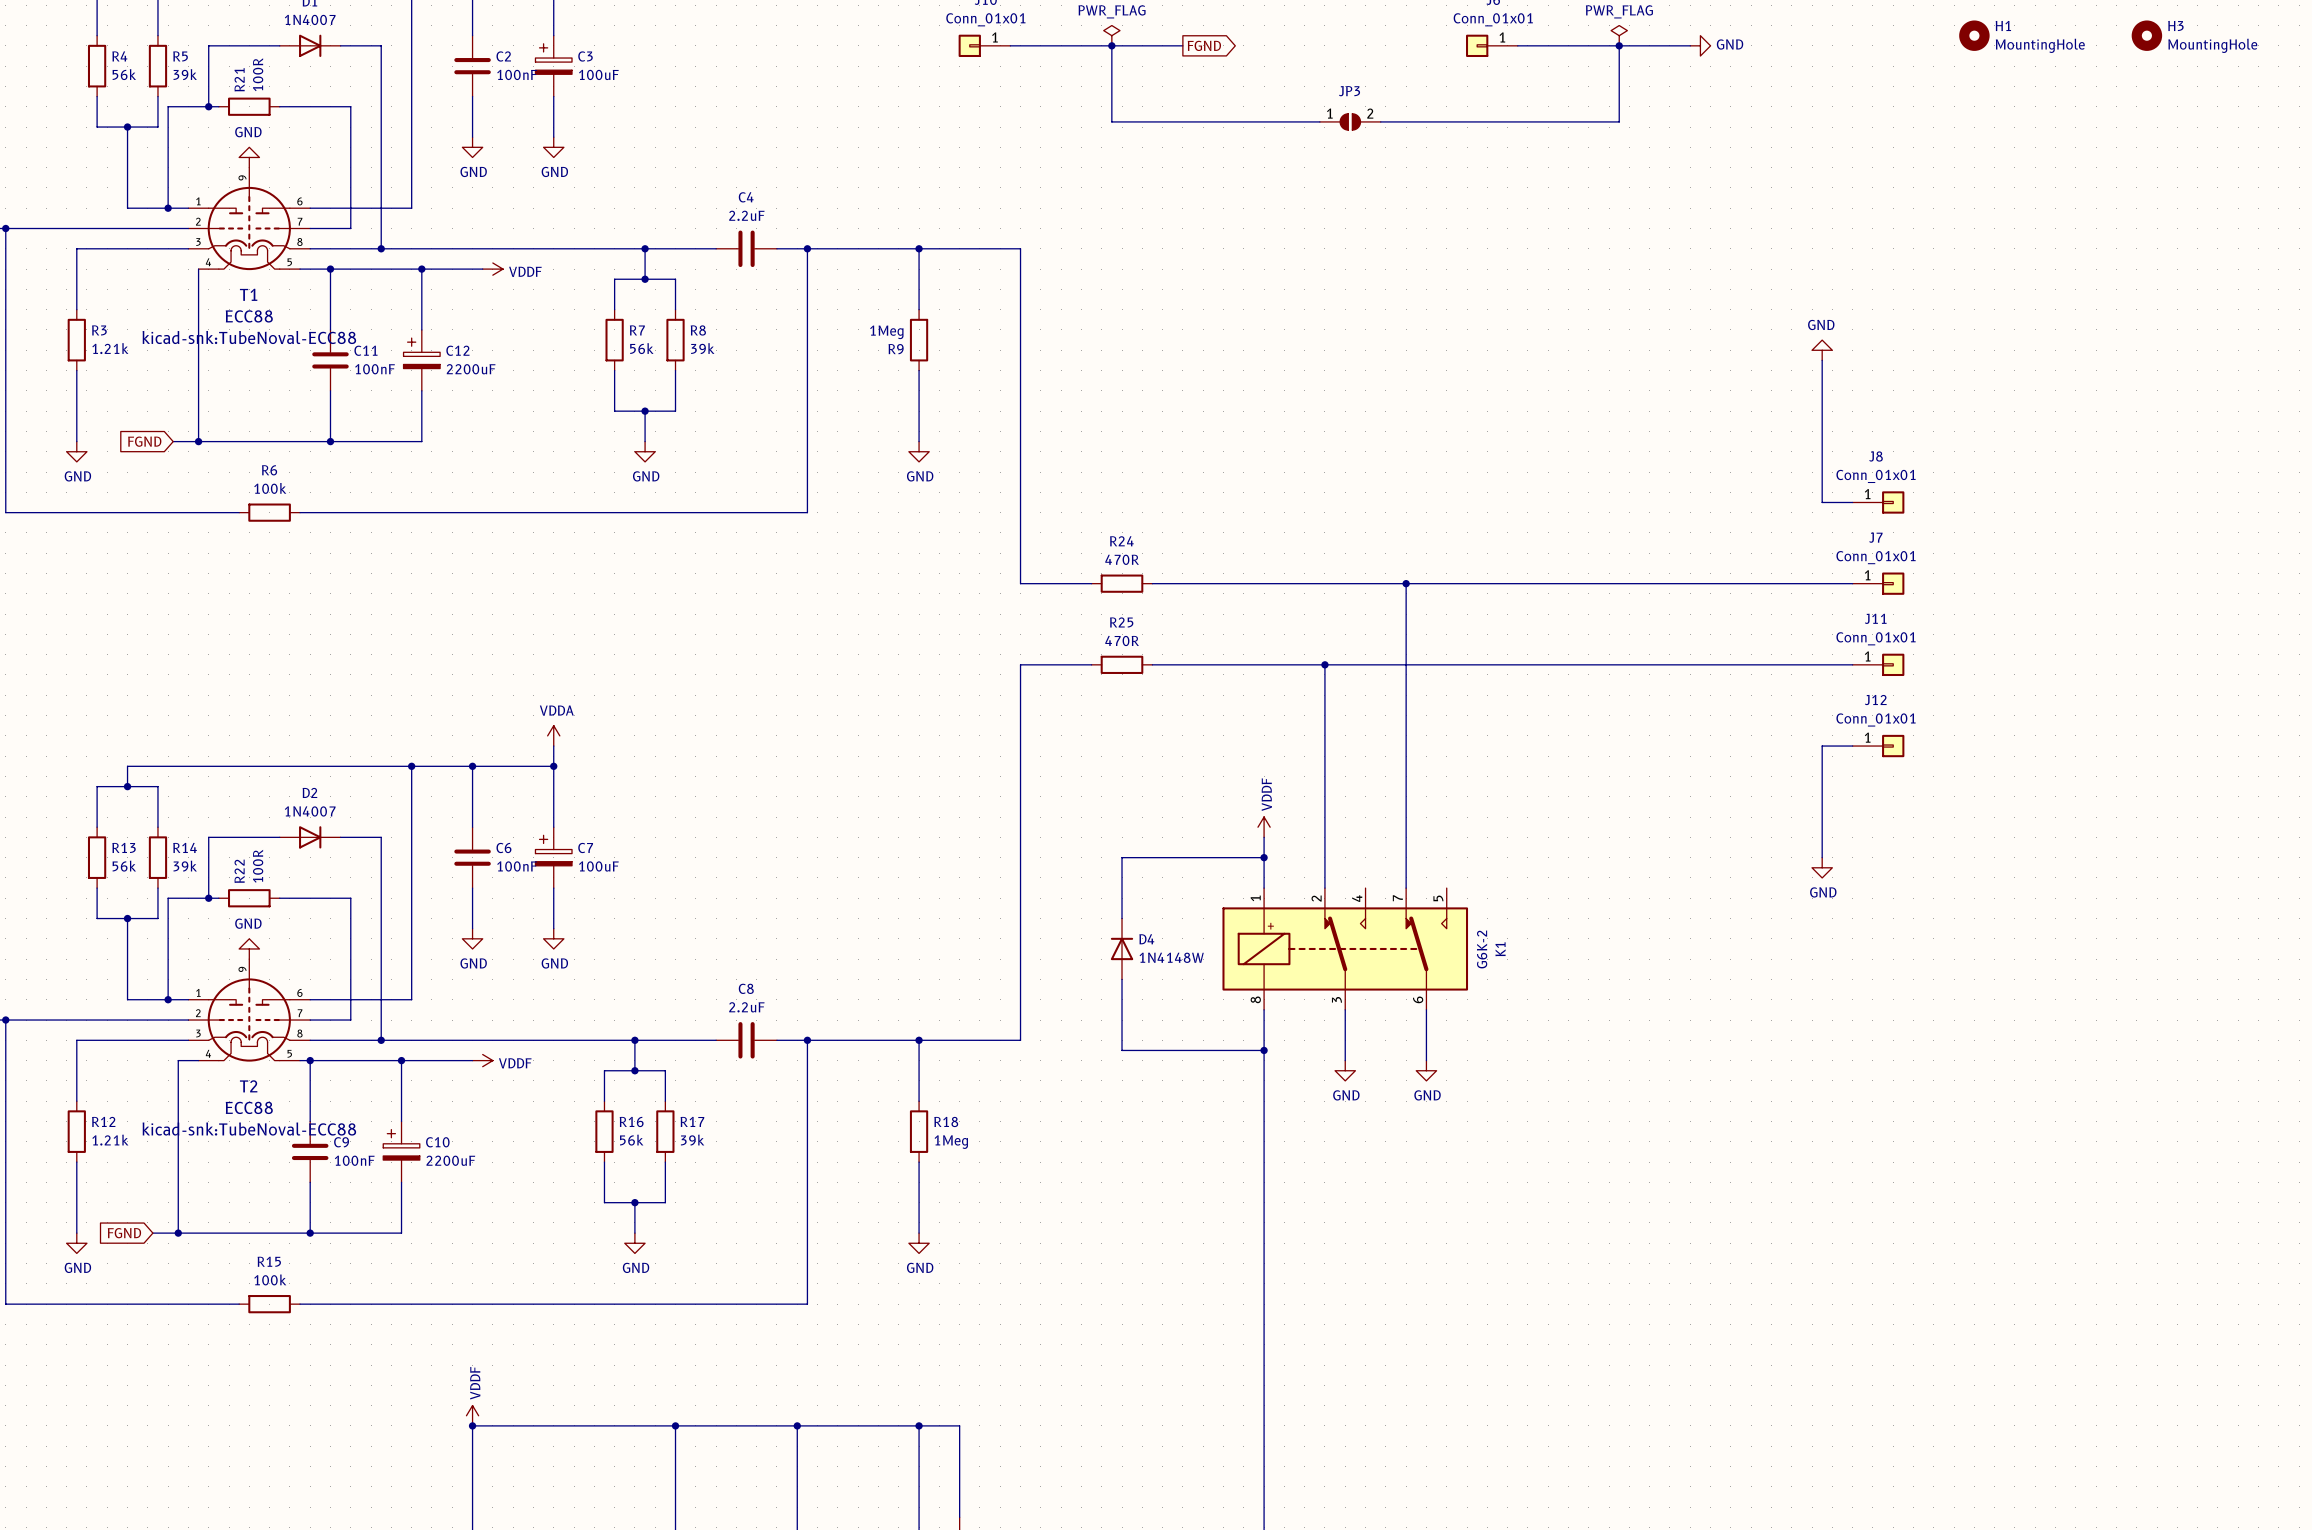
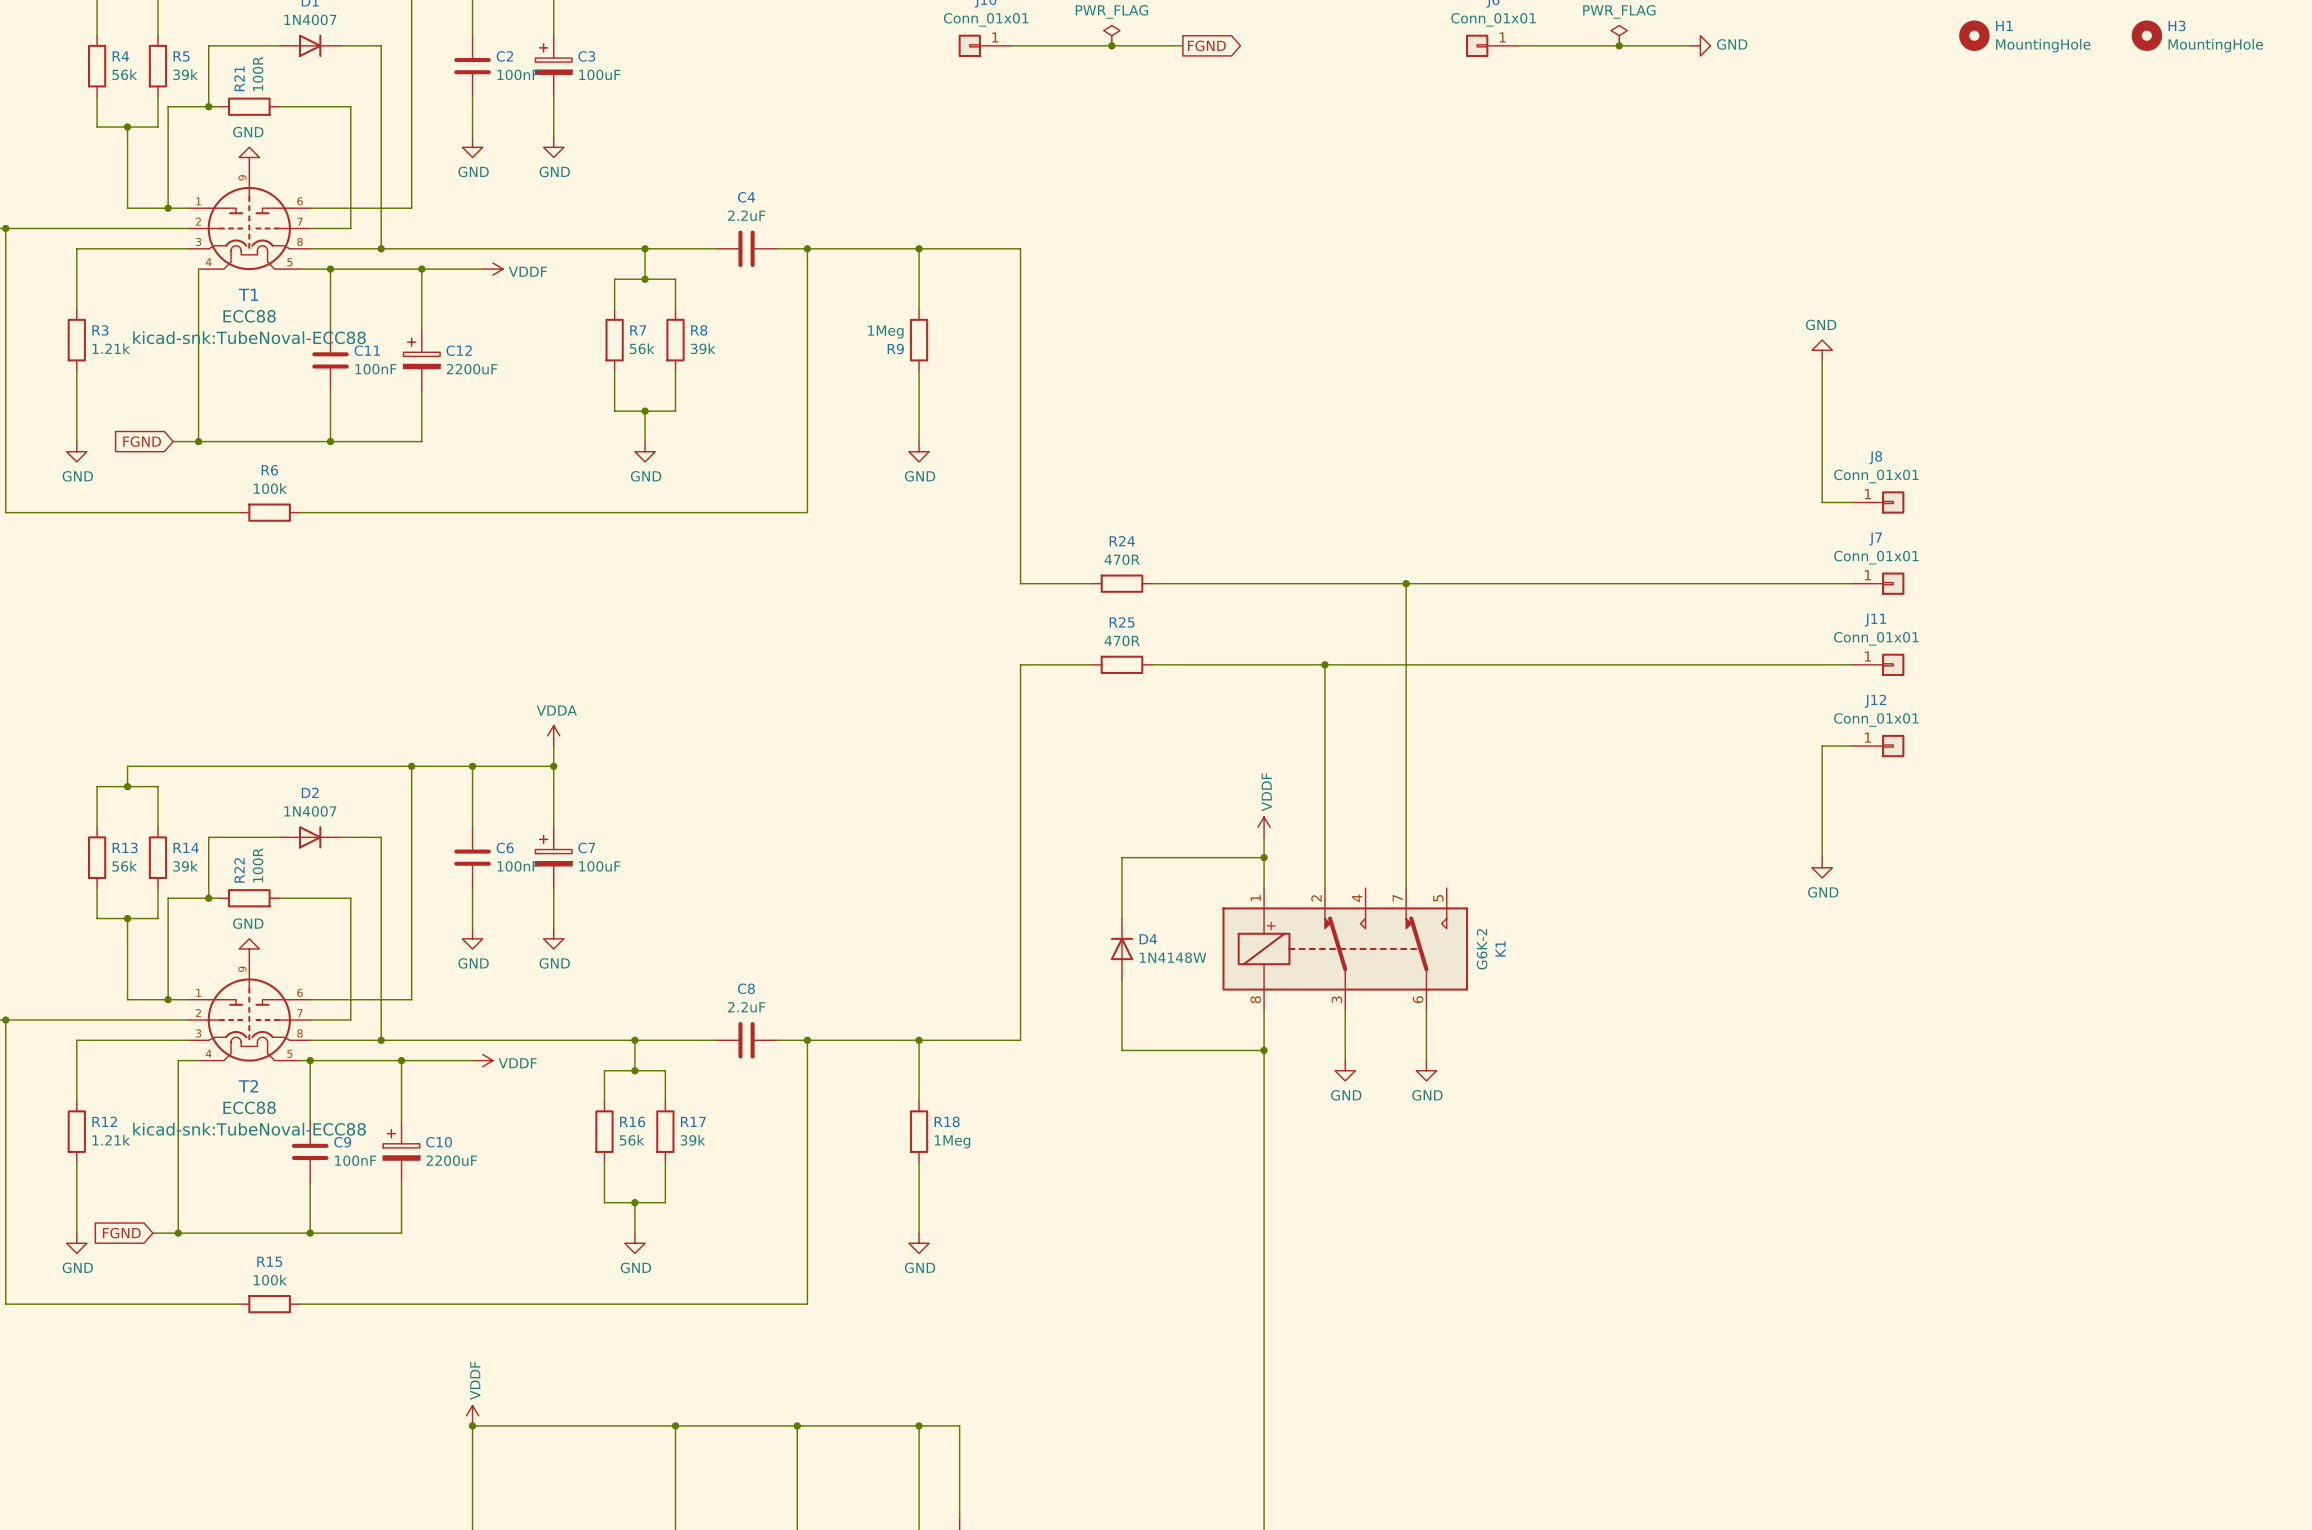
wire: (1111, 45) (1111, 121) (1319, 121) -> none
wire: (1619, 45) (1619, 121) (1380, 121) -> none
JP3: (1350, 121) -> none

